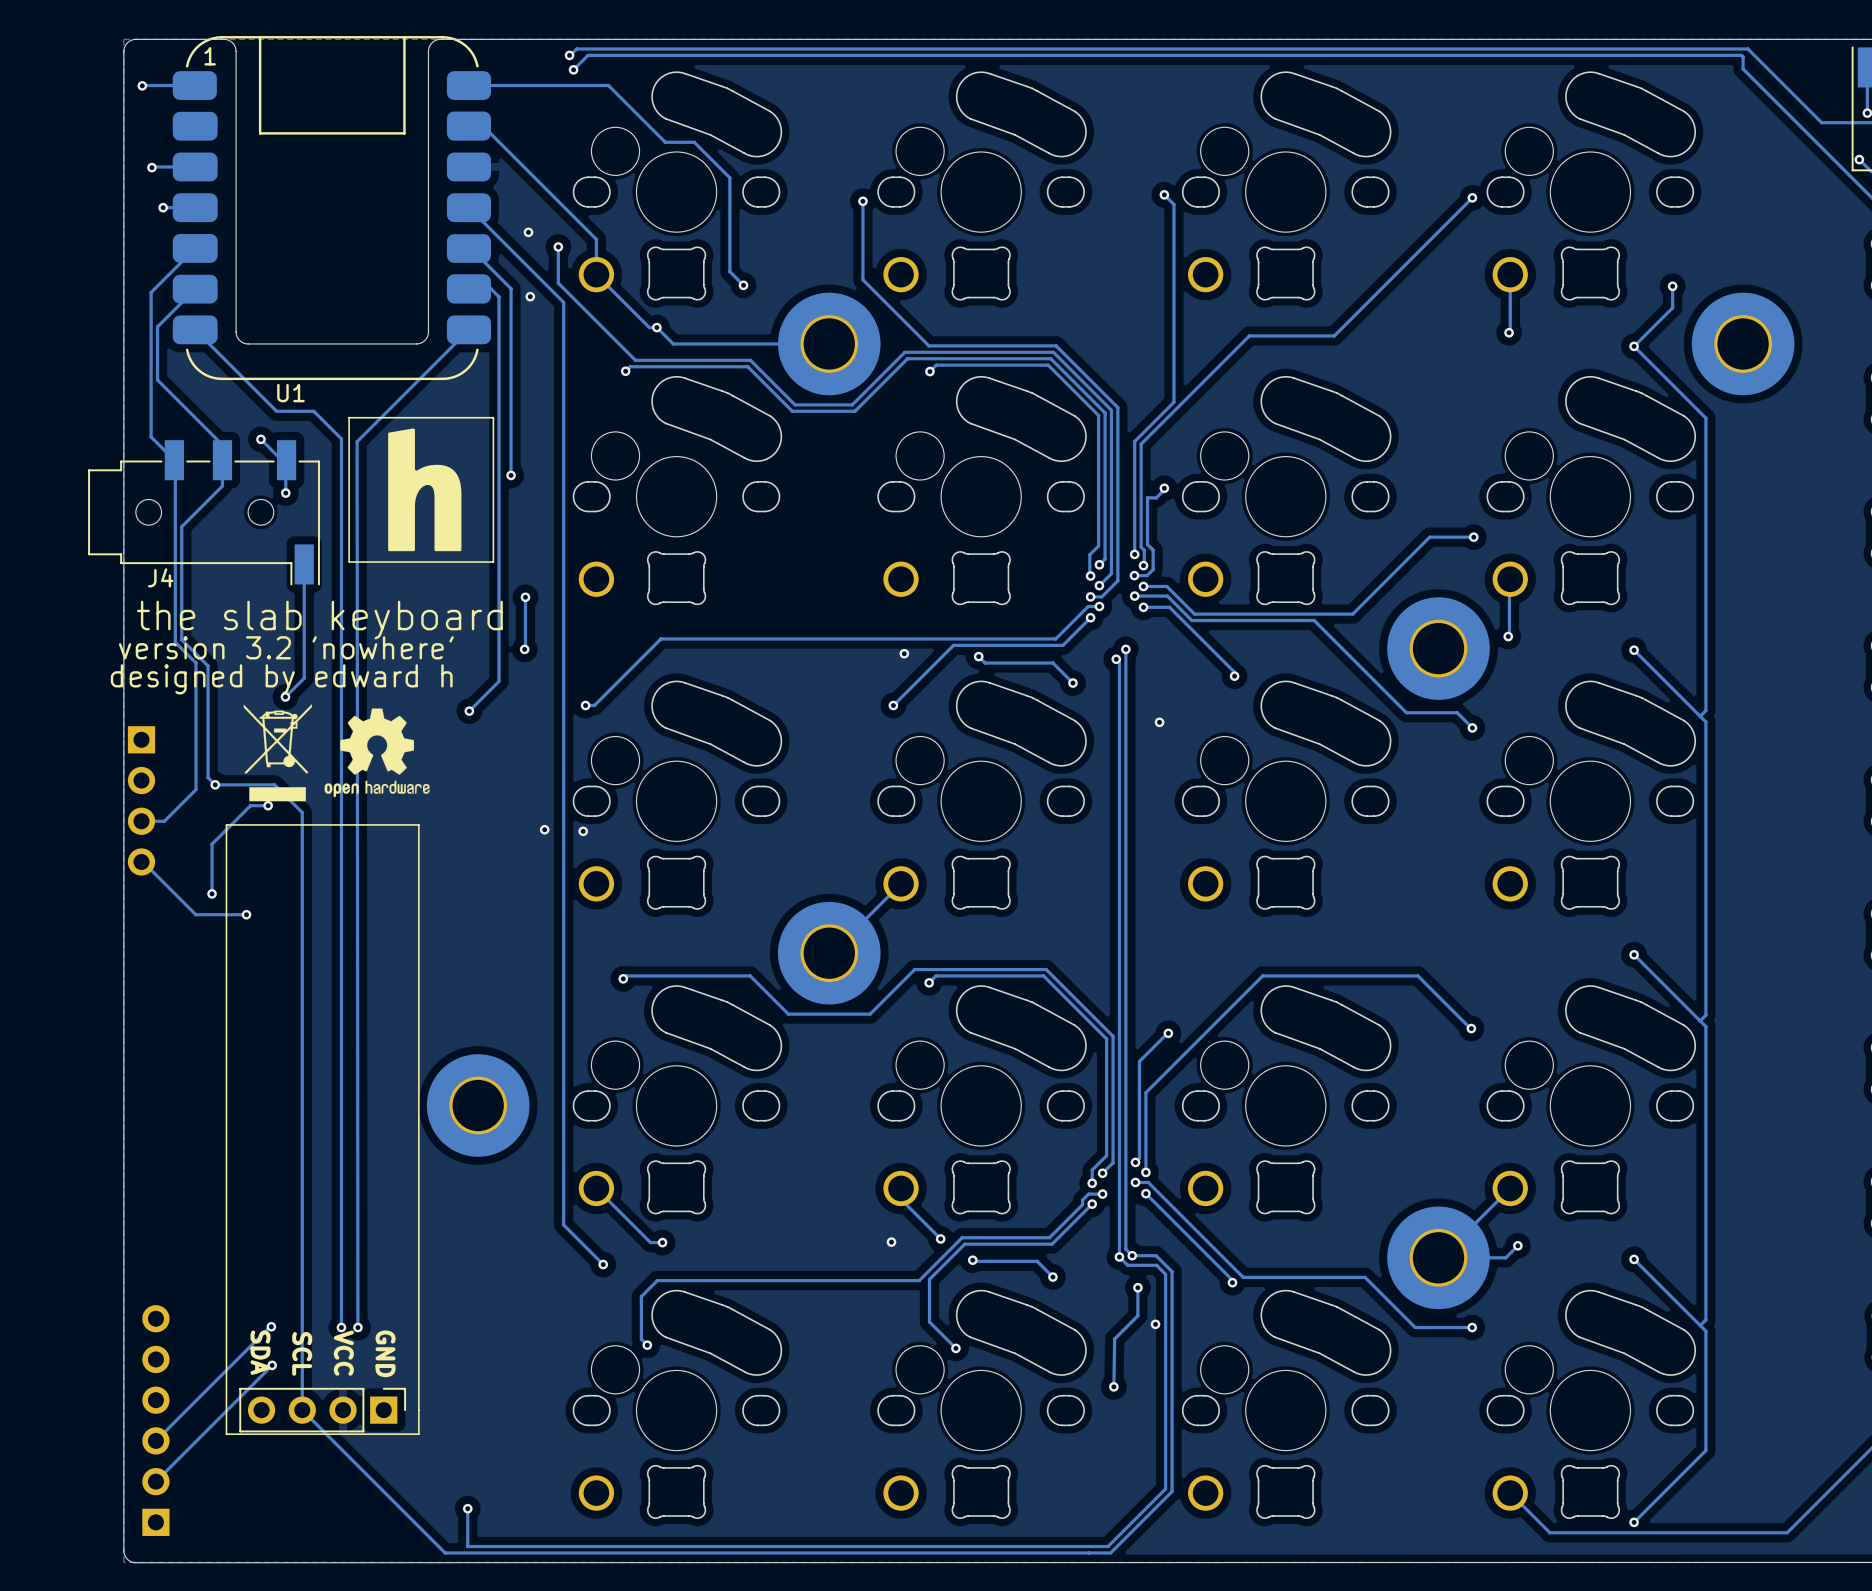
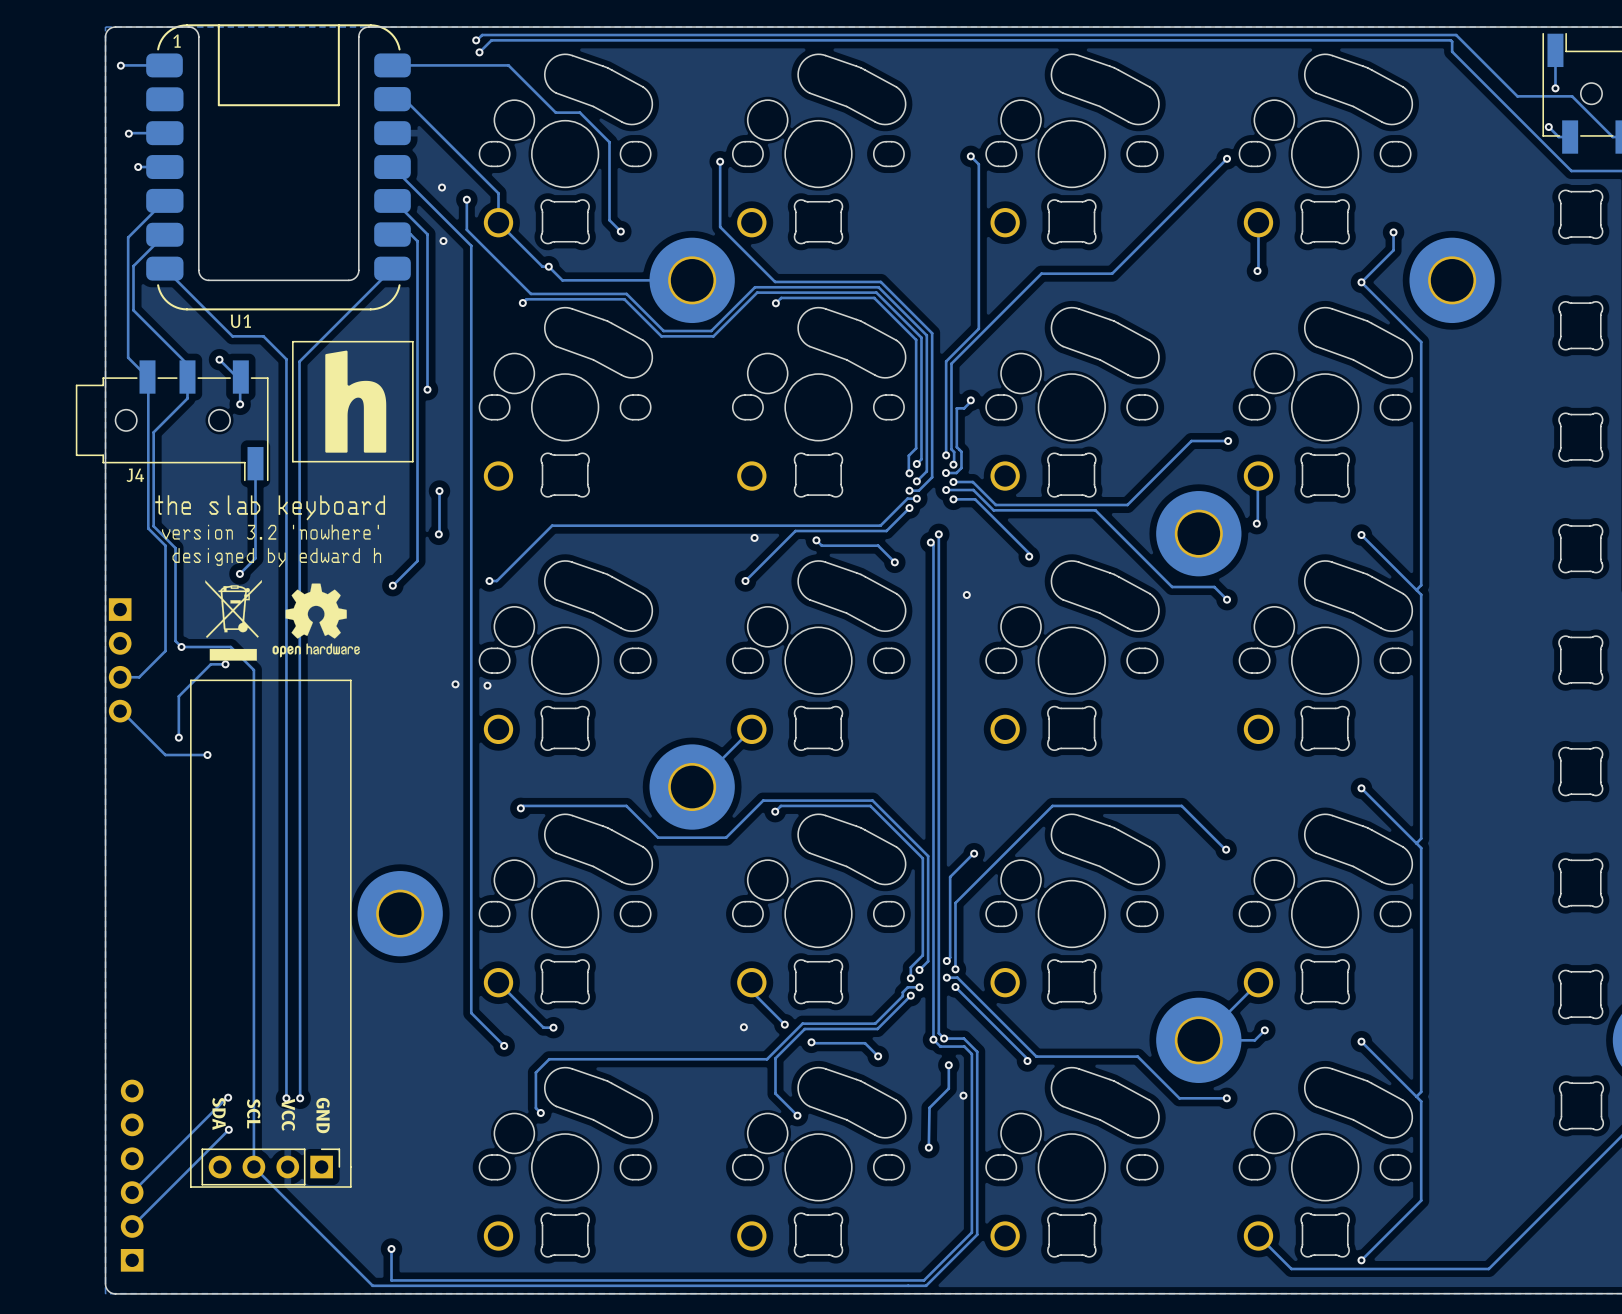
drawing: none -> [155, 495, 386, 568]
text: the slab keyboard (319, 620) -> none
text: version 3.2 'nowhere' (286, 647) -> none
text: designed by edward h (281, 679) -> none

